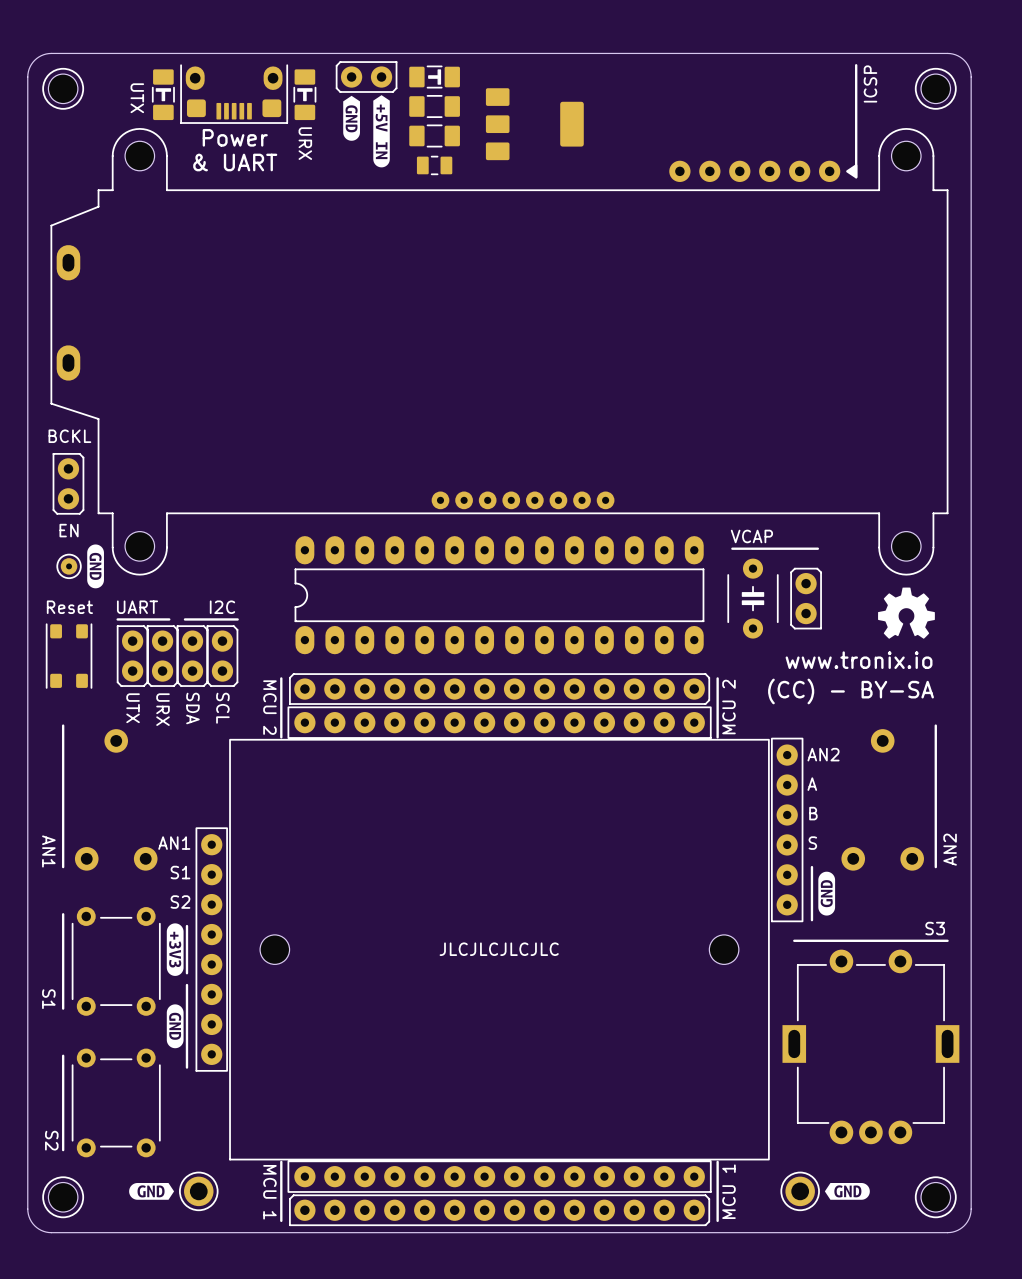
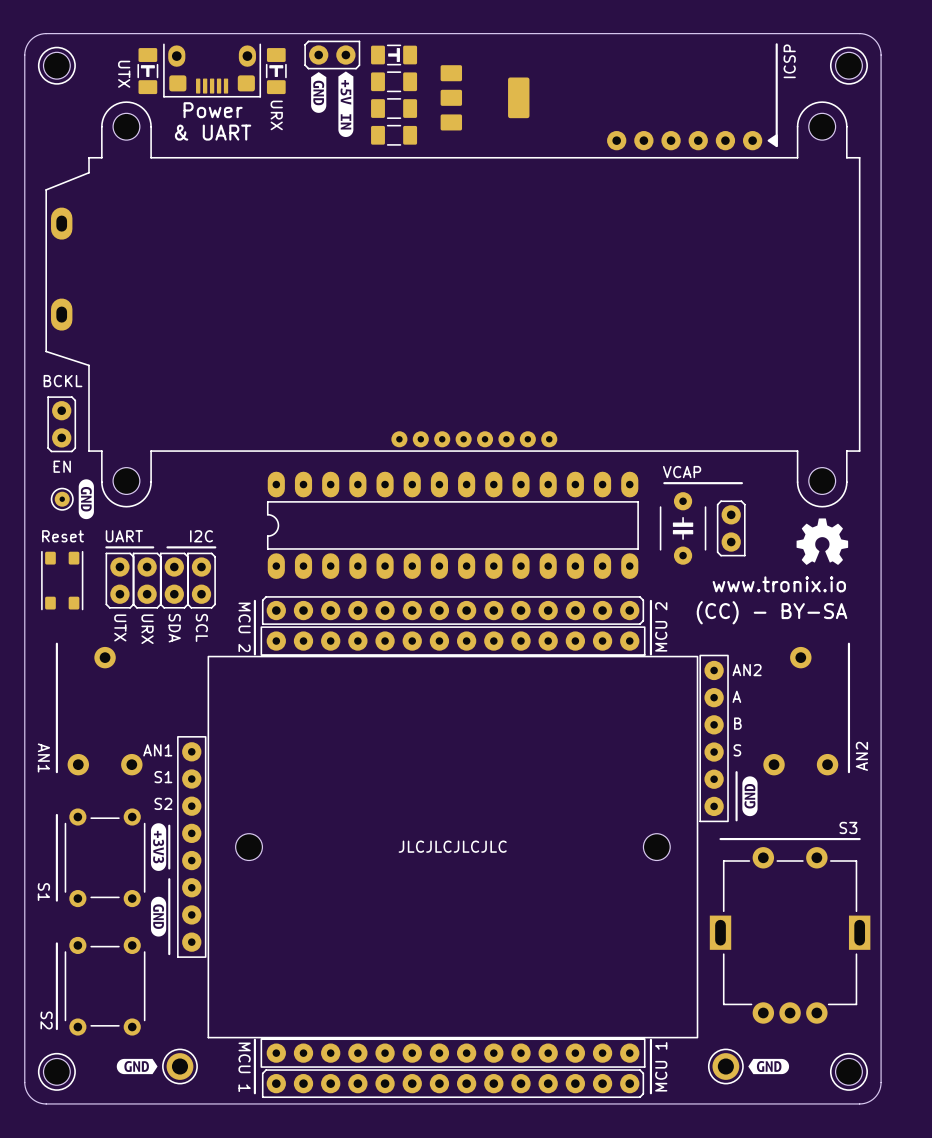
part footprint: [416, 155, 453, 176] -> [371, 124, 418, 146]

